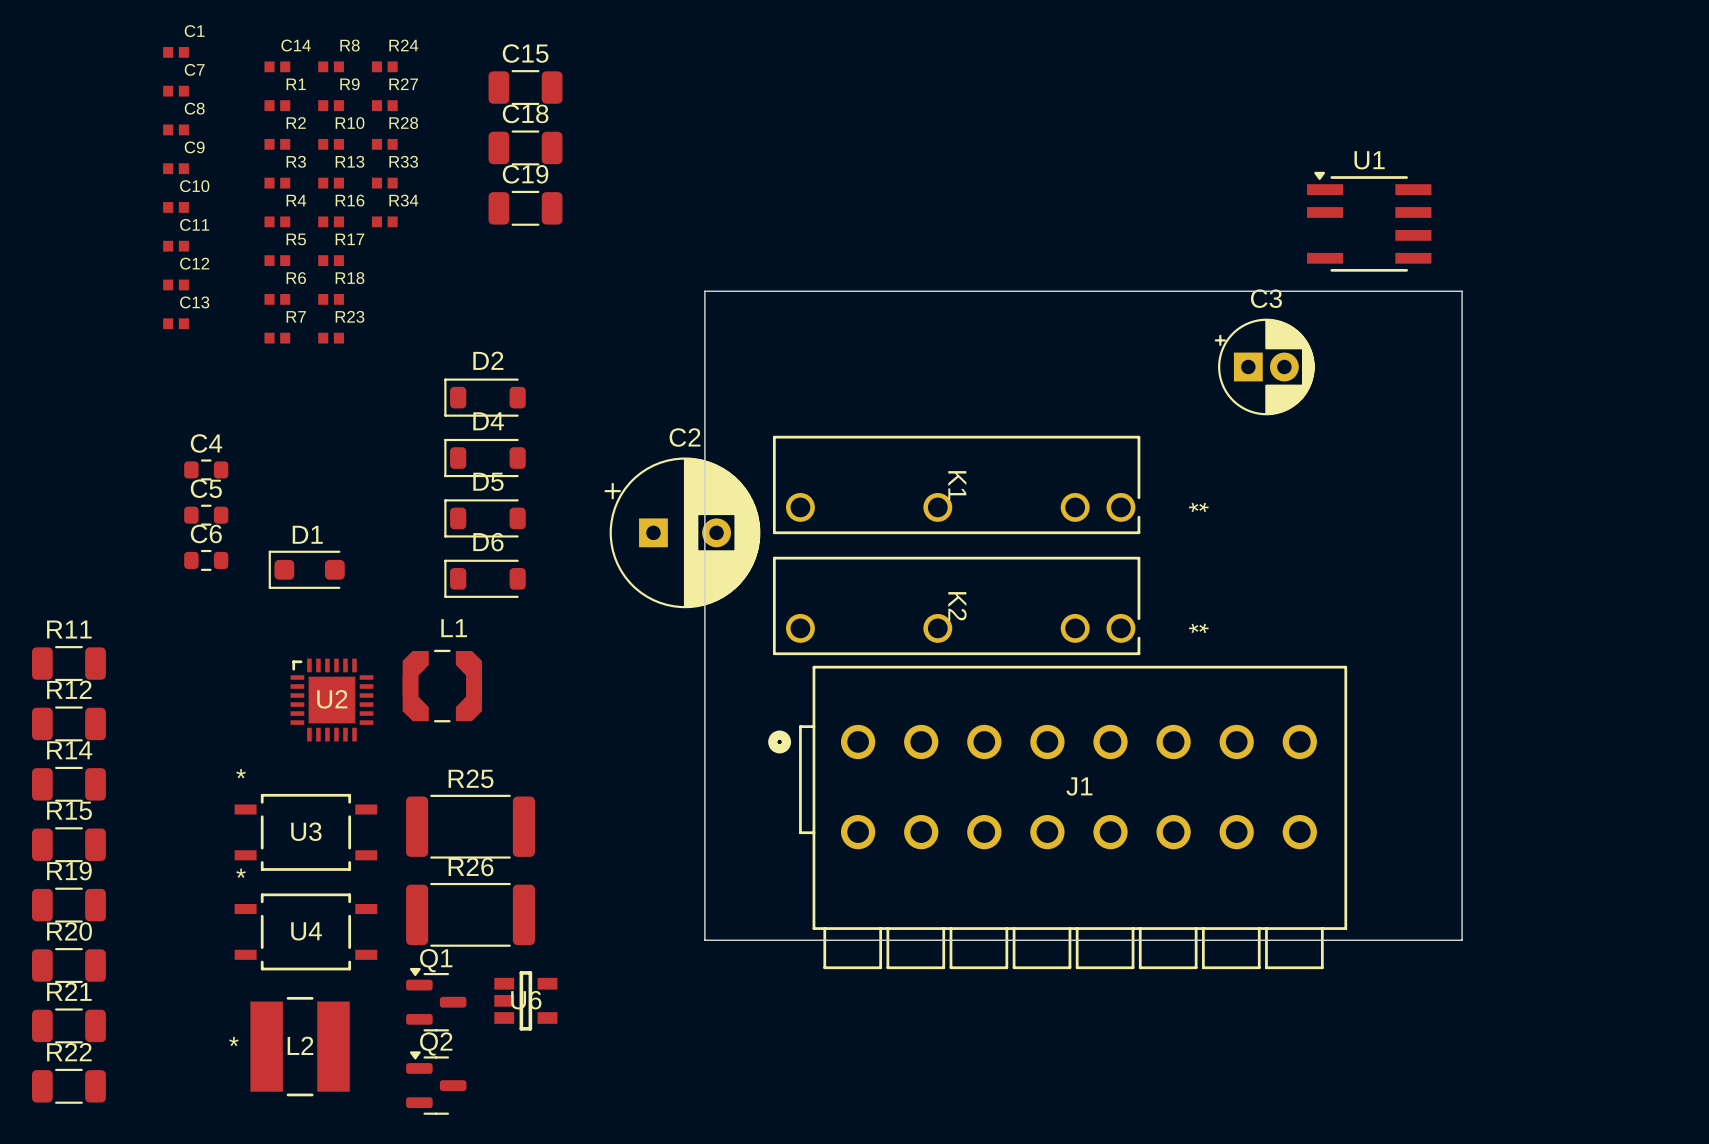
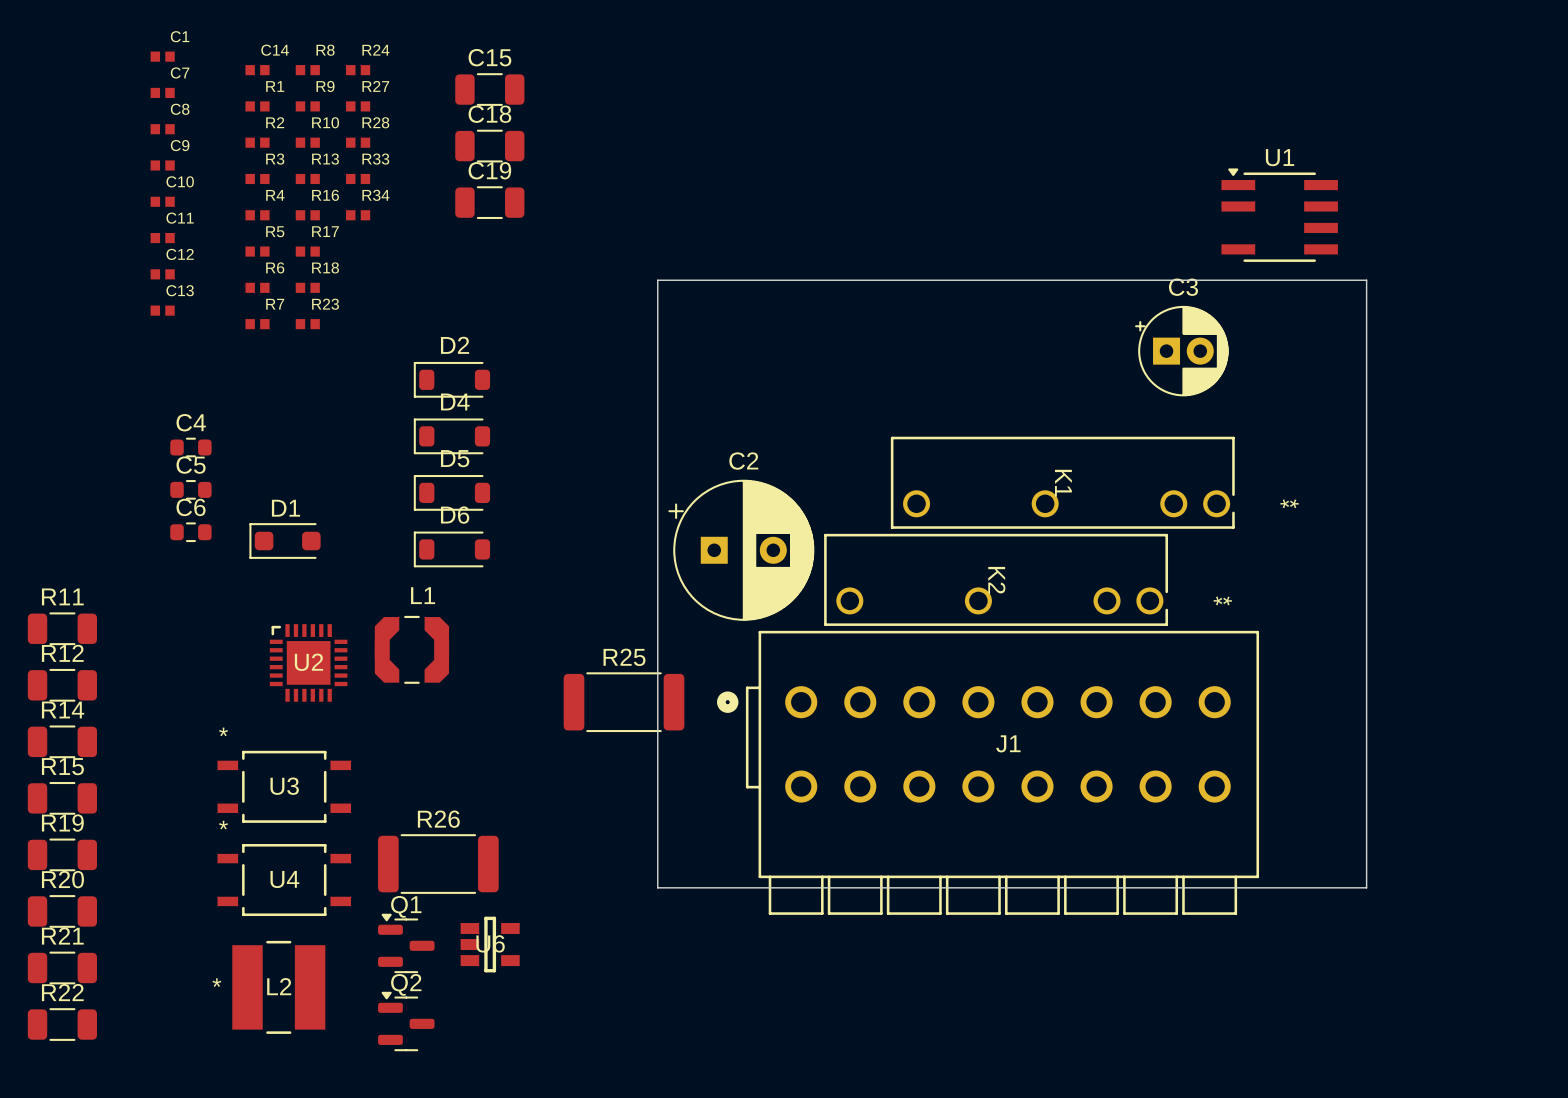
K1 position: (956, 484) -> (1062, 482)
C2 position: (682, 532) -> (741, 550)
K2 position: (956, 605) -> (996, 579)
R25 position: (470, 826) -> (624, 702)

